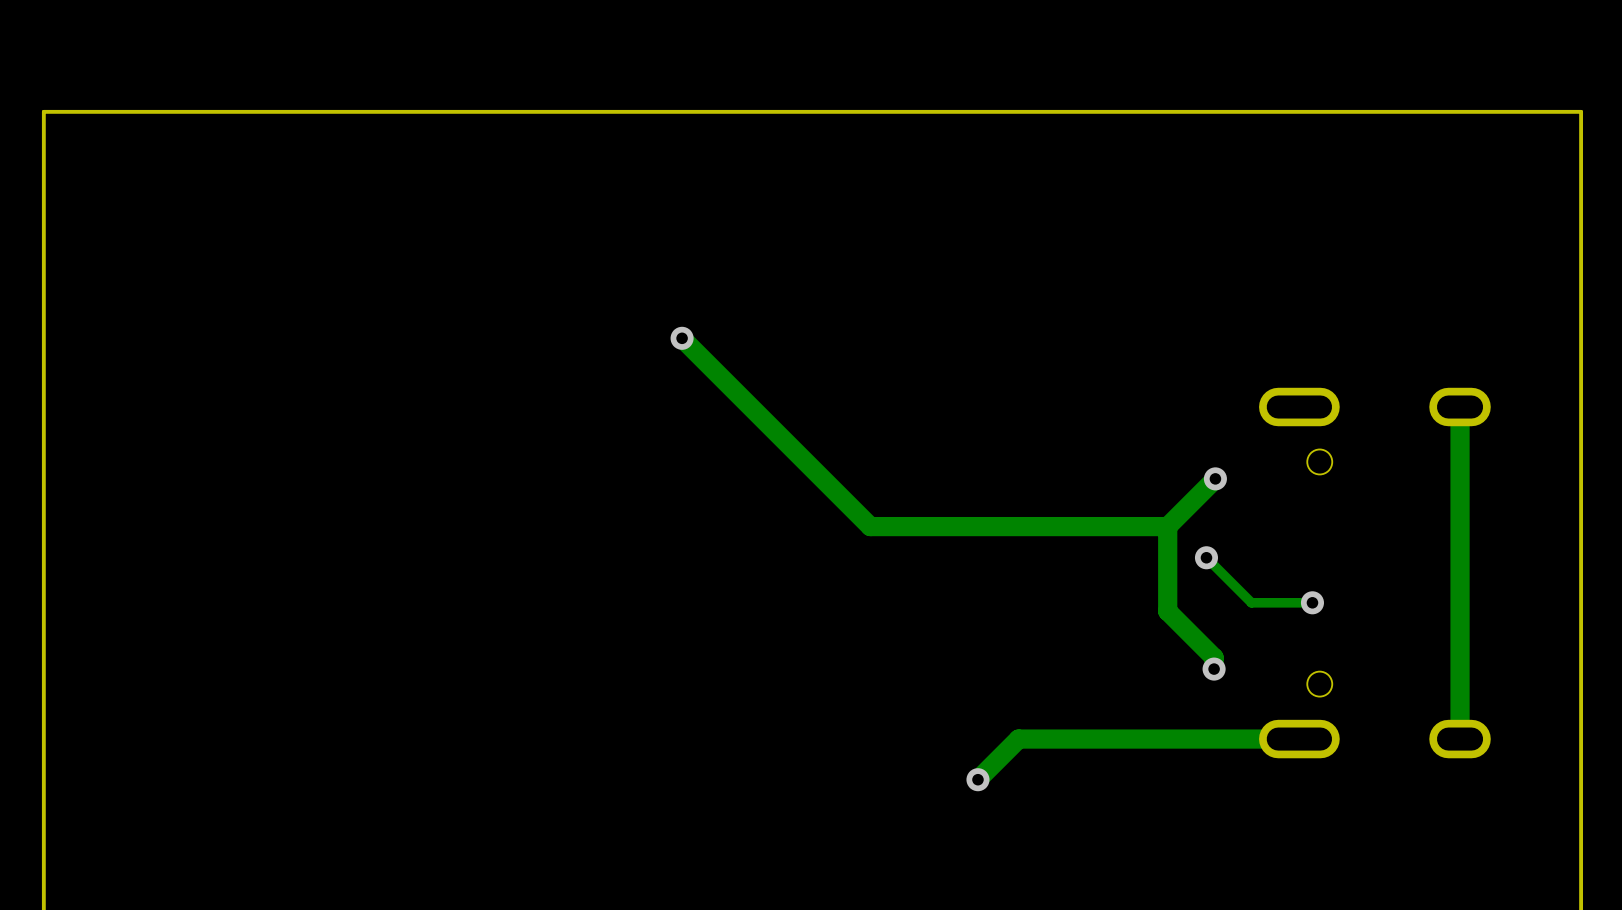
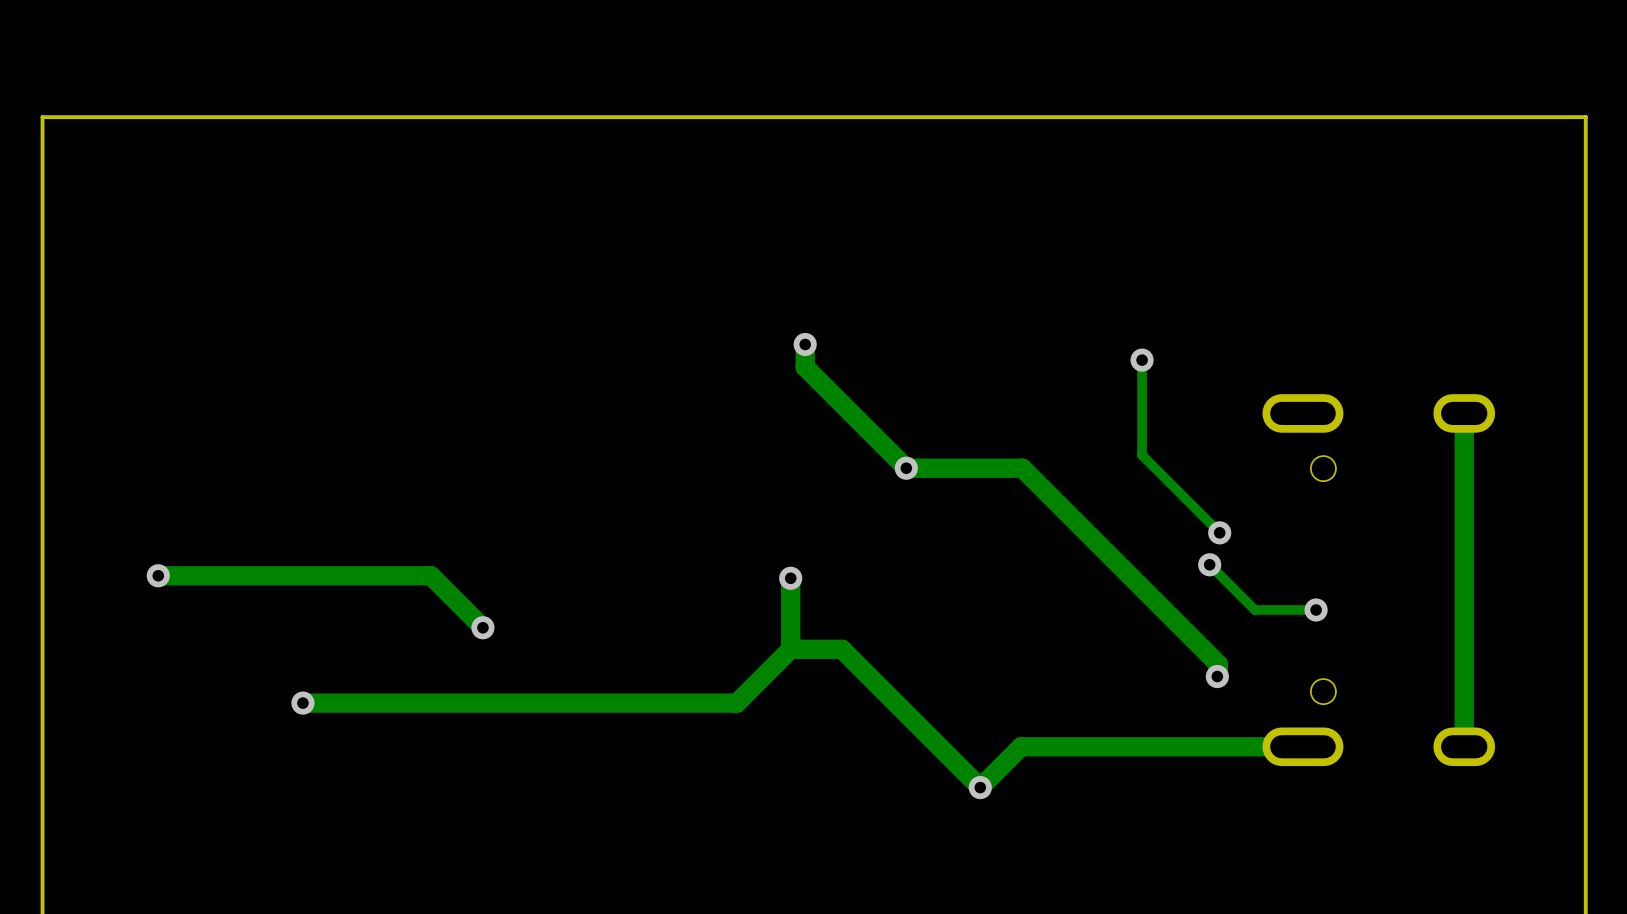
track: (682, 338) (870, 526) (1167, 526) -> none
via position: (682, 338) -> (805, 344)
track: none -> (805, 344) (805, 367) (906, 468) (1022, 468) (1218, 664) (1218, 674)
track: none -> (1142, 360) (1142, 455) (1219, 532)
via: none -> (1142, 360)
via: none -> (906, 468)
track: (1215, 478) (1167, 526) -> none
via position: (1215, 478) -> (1219, 532)
track: (1167, 526) (1167, 611) (1214, 657) (1214, 669) -> none
track: none -> (158, 575) (430, 575) (482, 627)
via: none -> (158, 575)
track: none -> (790, 578) (790, 649)
via: none -> (790, 578)
via: none -> (482, 627)
track: none -> (790, 649) (736, 703) (302, 703)
track: none -> (790, 649) (842, 649) (980, 787)
via: none -> (302, 703)

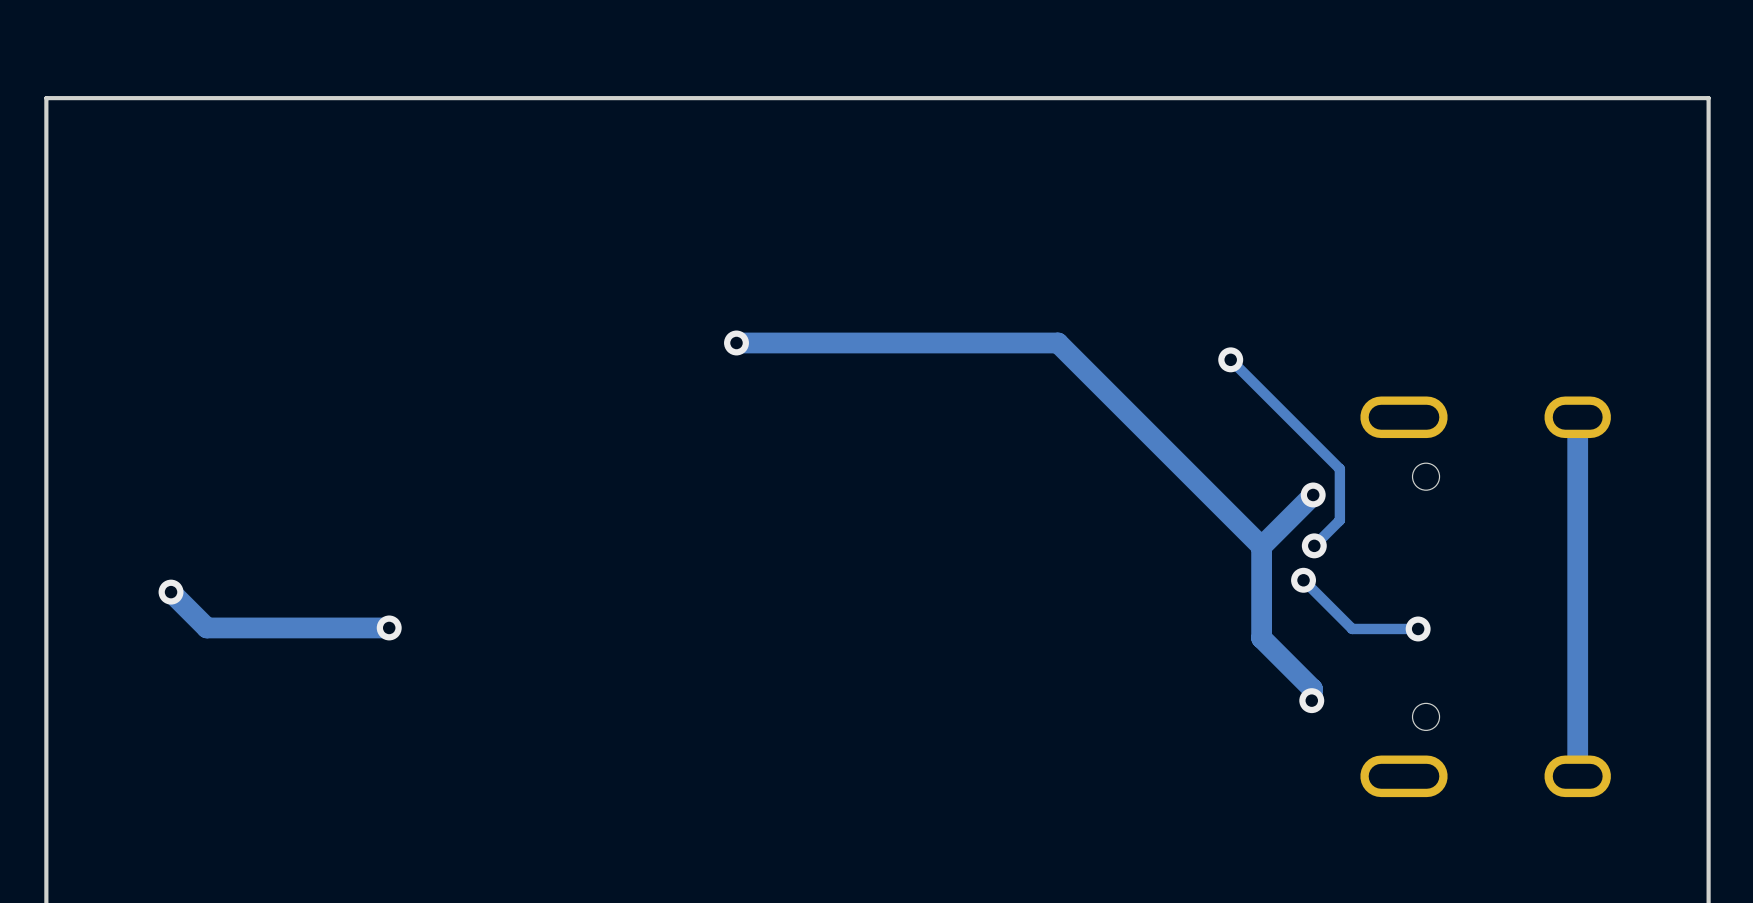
track: none -> (736, 342) (1058, 342) (1261, 546)
track: (805, 344) (805, 367) (906, 468) (1022, 468) (1217, 665) -> (1261, 546) (1261, 638) (1312, 688)
via position: (805, 344) -> (736, 342)
track: (1142, 360) (1142, 455) (1219, 532) -> (1230, 359) (1339, 468) (1339, 520) (1314, 545)
via: (906, 468) -> none
track: none -> (1313, 494) (1261, 546)
via: none -> (1313, 494)
track: (158, 575) (430, 575) (482, 627) -> (171, 592) (206, 627) (389, 627)
track: (790, 578) (790, 649) -> none
via: (790, 578) -> none
via: none -> (389, 627)
via: (482, 627) -> none
track: (790, 649) (736, 703) (302, 703) -> none
track: (790, 649) (842, 649) (980, 787) (1021, 746) (1302, 746) -> none
via: (302, 703) -> none
via: (980, 787) -> none

